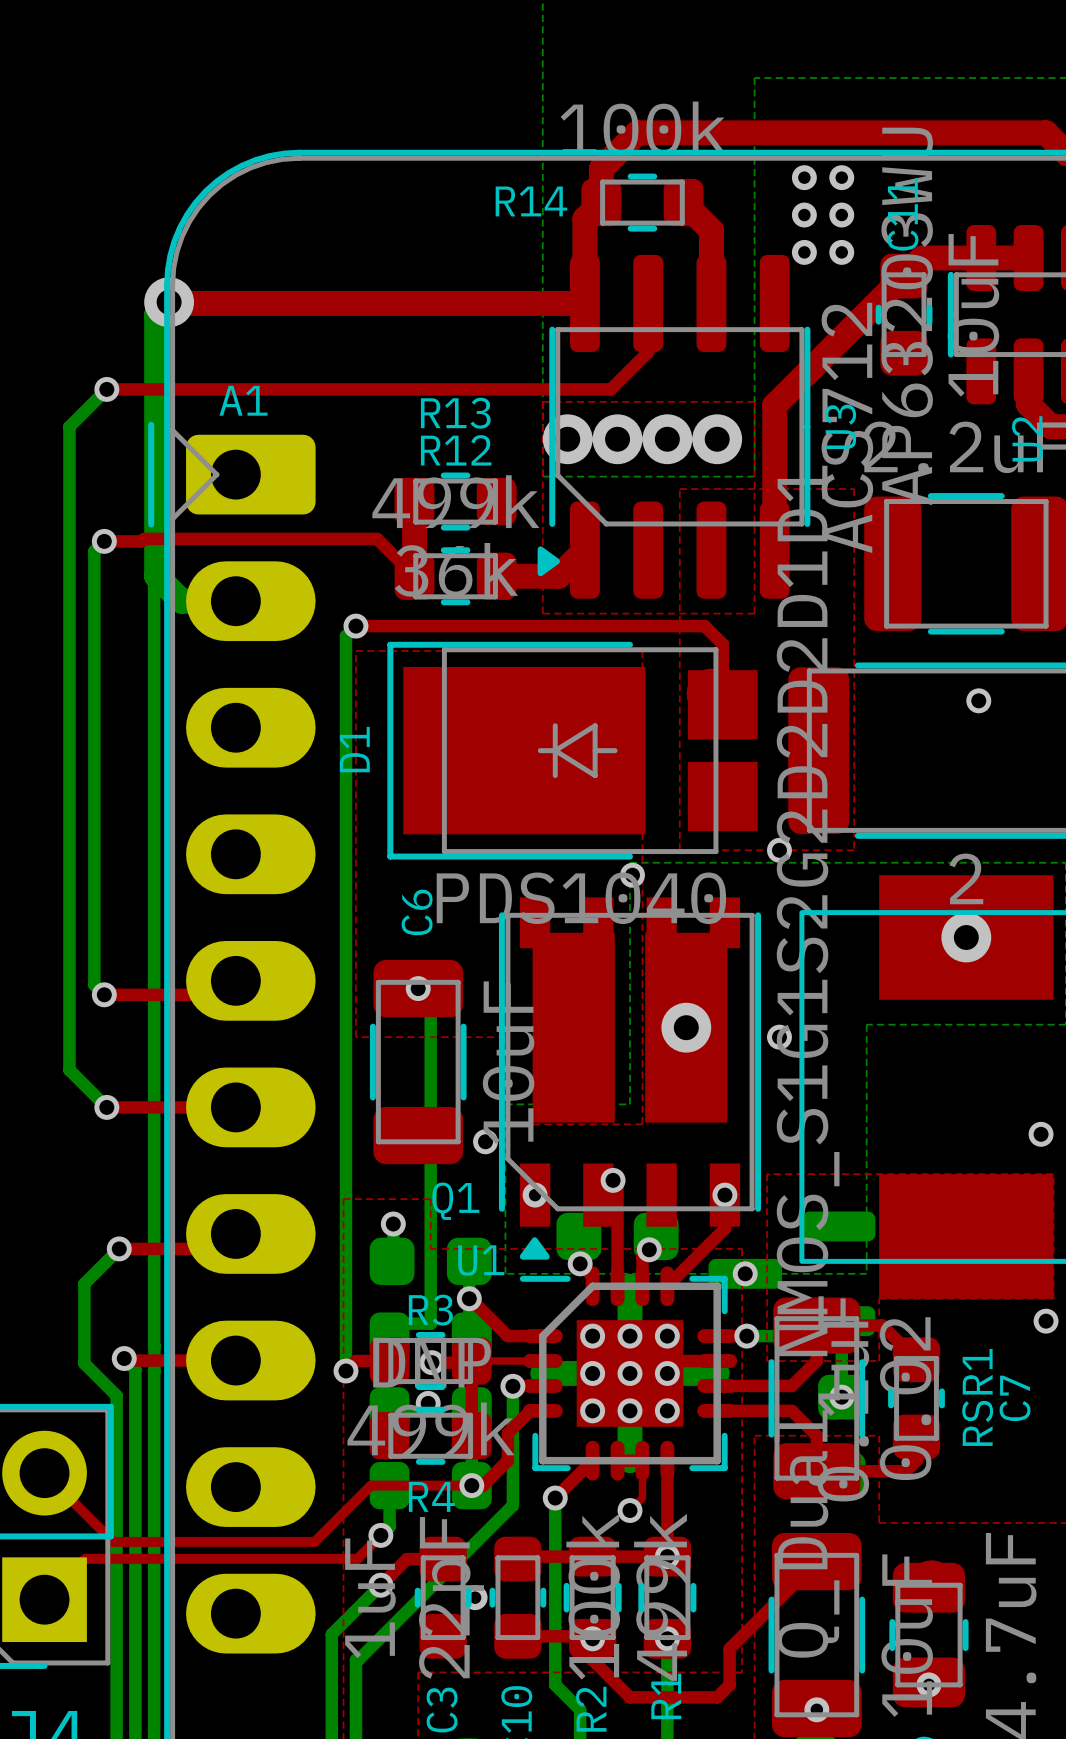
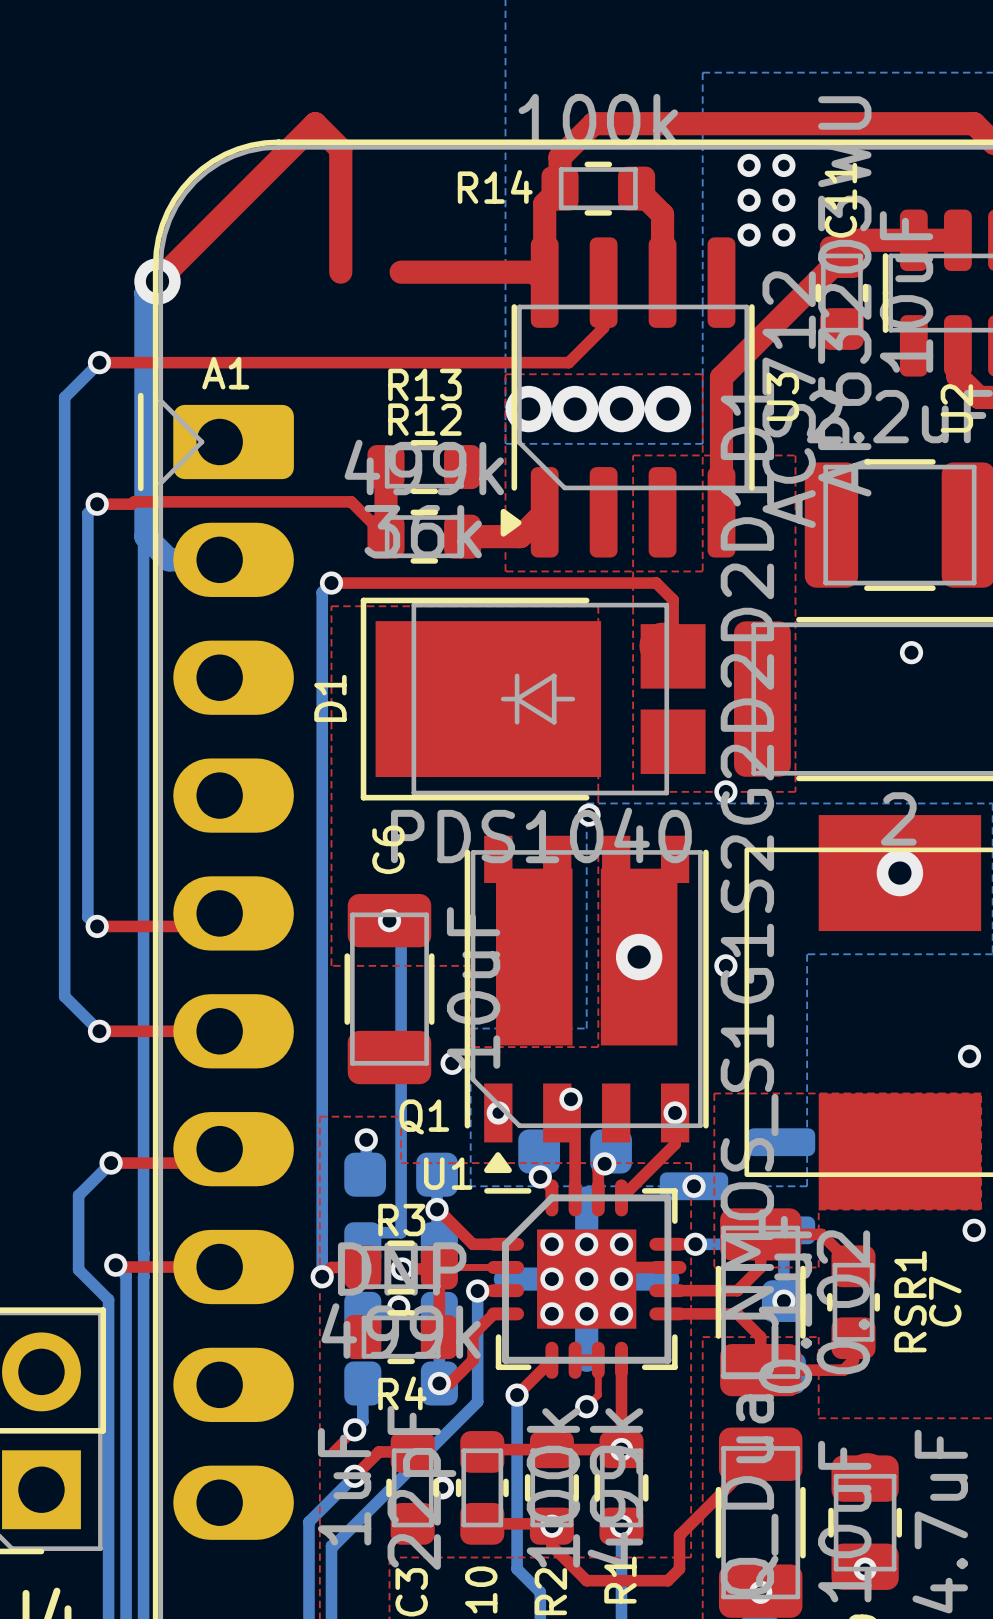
top track: none -> (401, 272) (534, 272) (544, 282)
top track: (170, 303) (584, 303) -> (157, 281) (315, 123) (340, 149) (340, 272)
top track: (44, 1473) (113, 1541) (314, 1541) (370, 1485) (471, 1485) -> none
top track: (357, 1558) (85, 1558) (44, 1599) -> none

